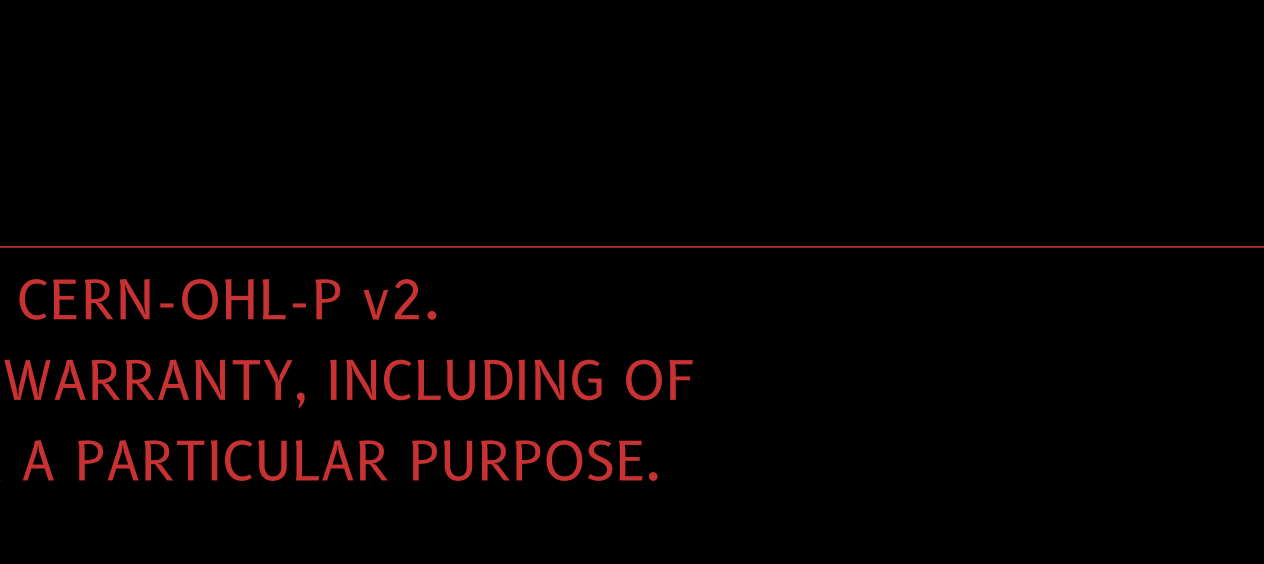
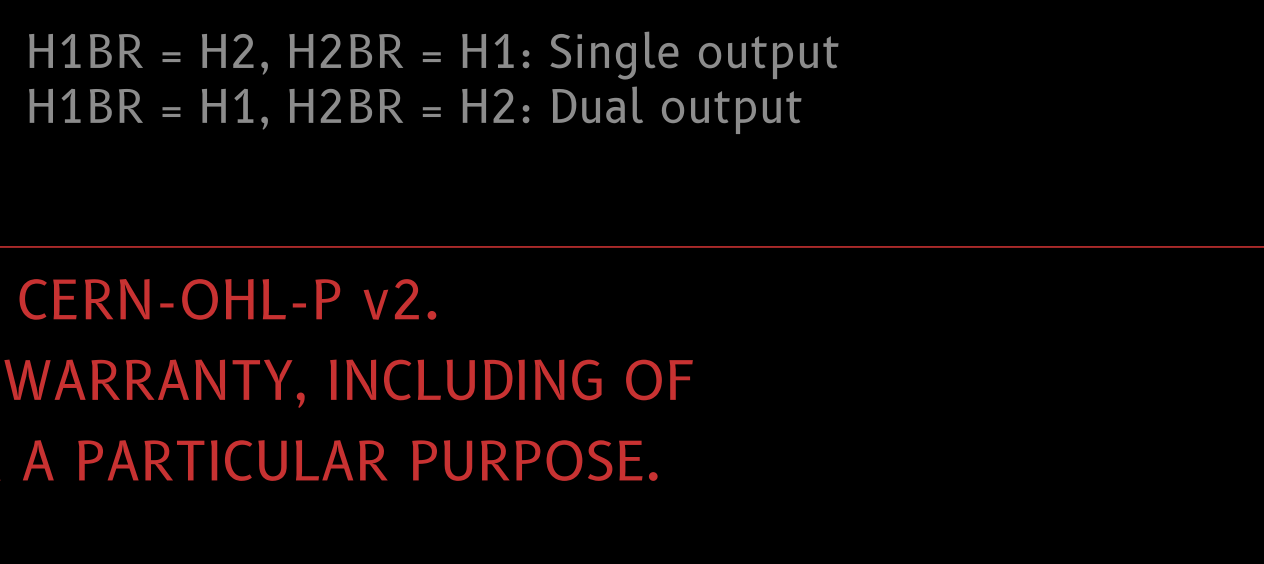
text: none -> H1BR = H2, H2BR = H1: Single output (433, 55)
text: none -> H1BR = H1, H2BR = H2: Dual output (415, 110)

